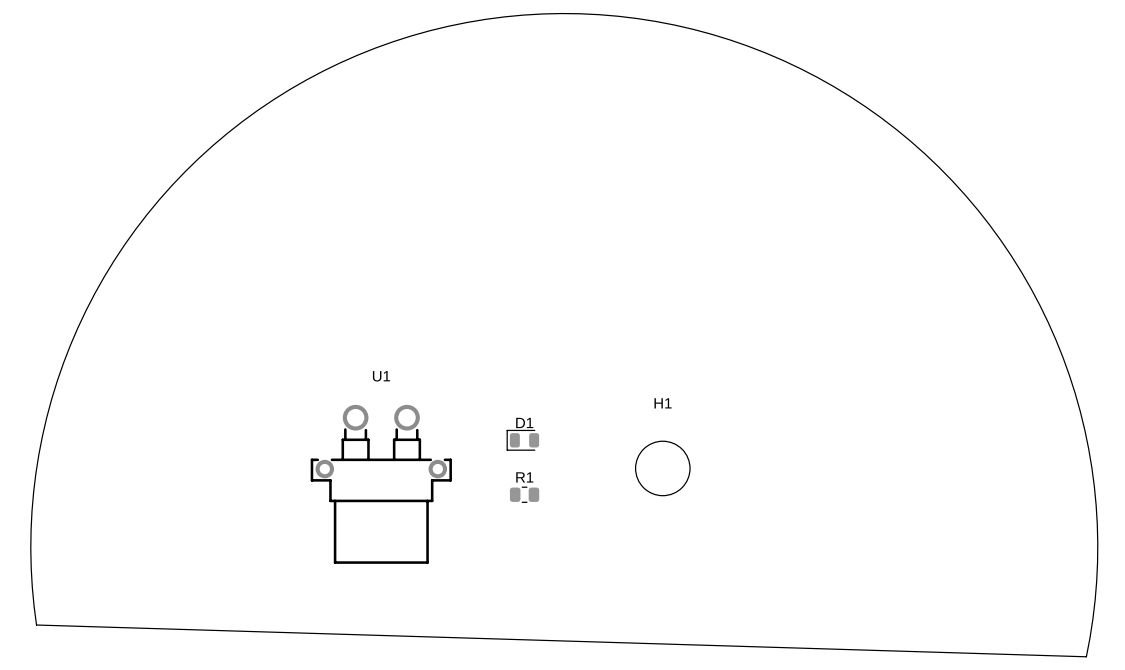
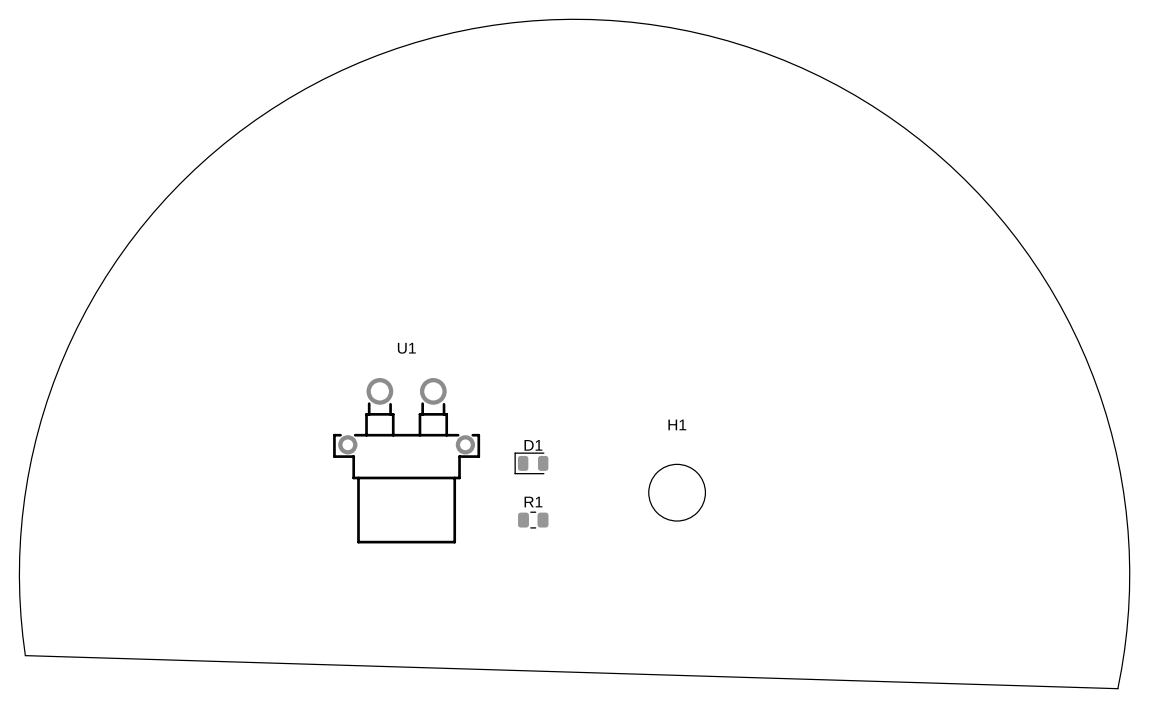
U1 position: (381, 484) -> (406, 460)

